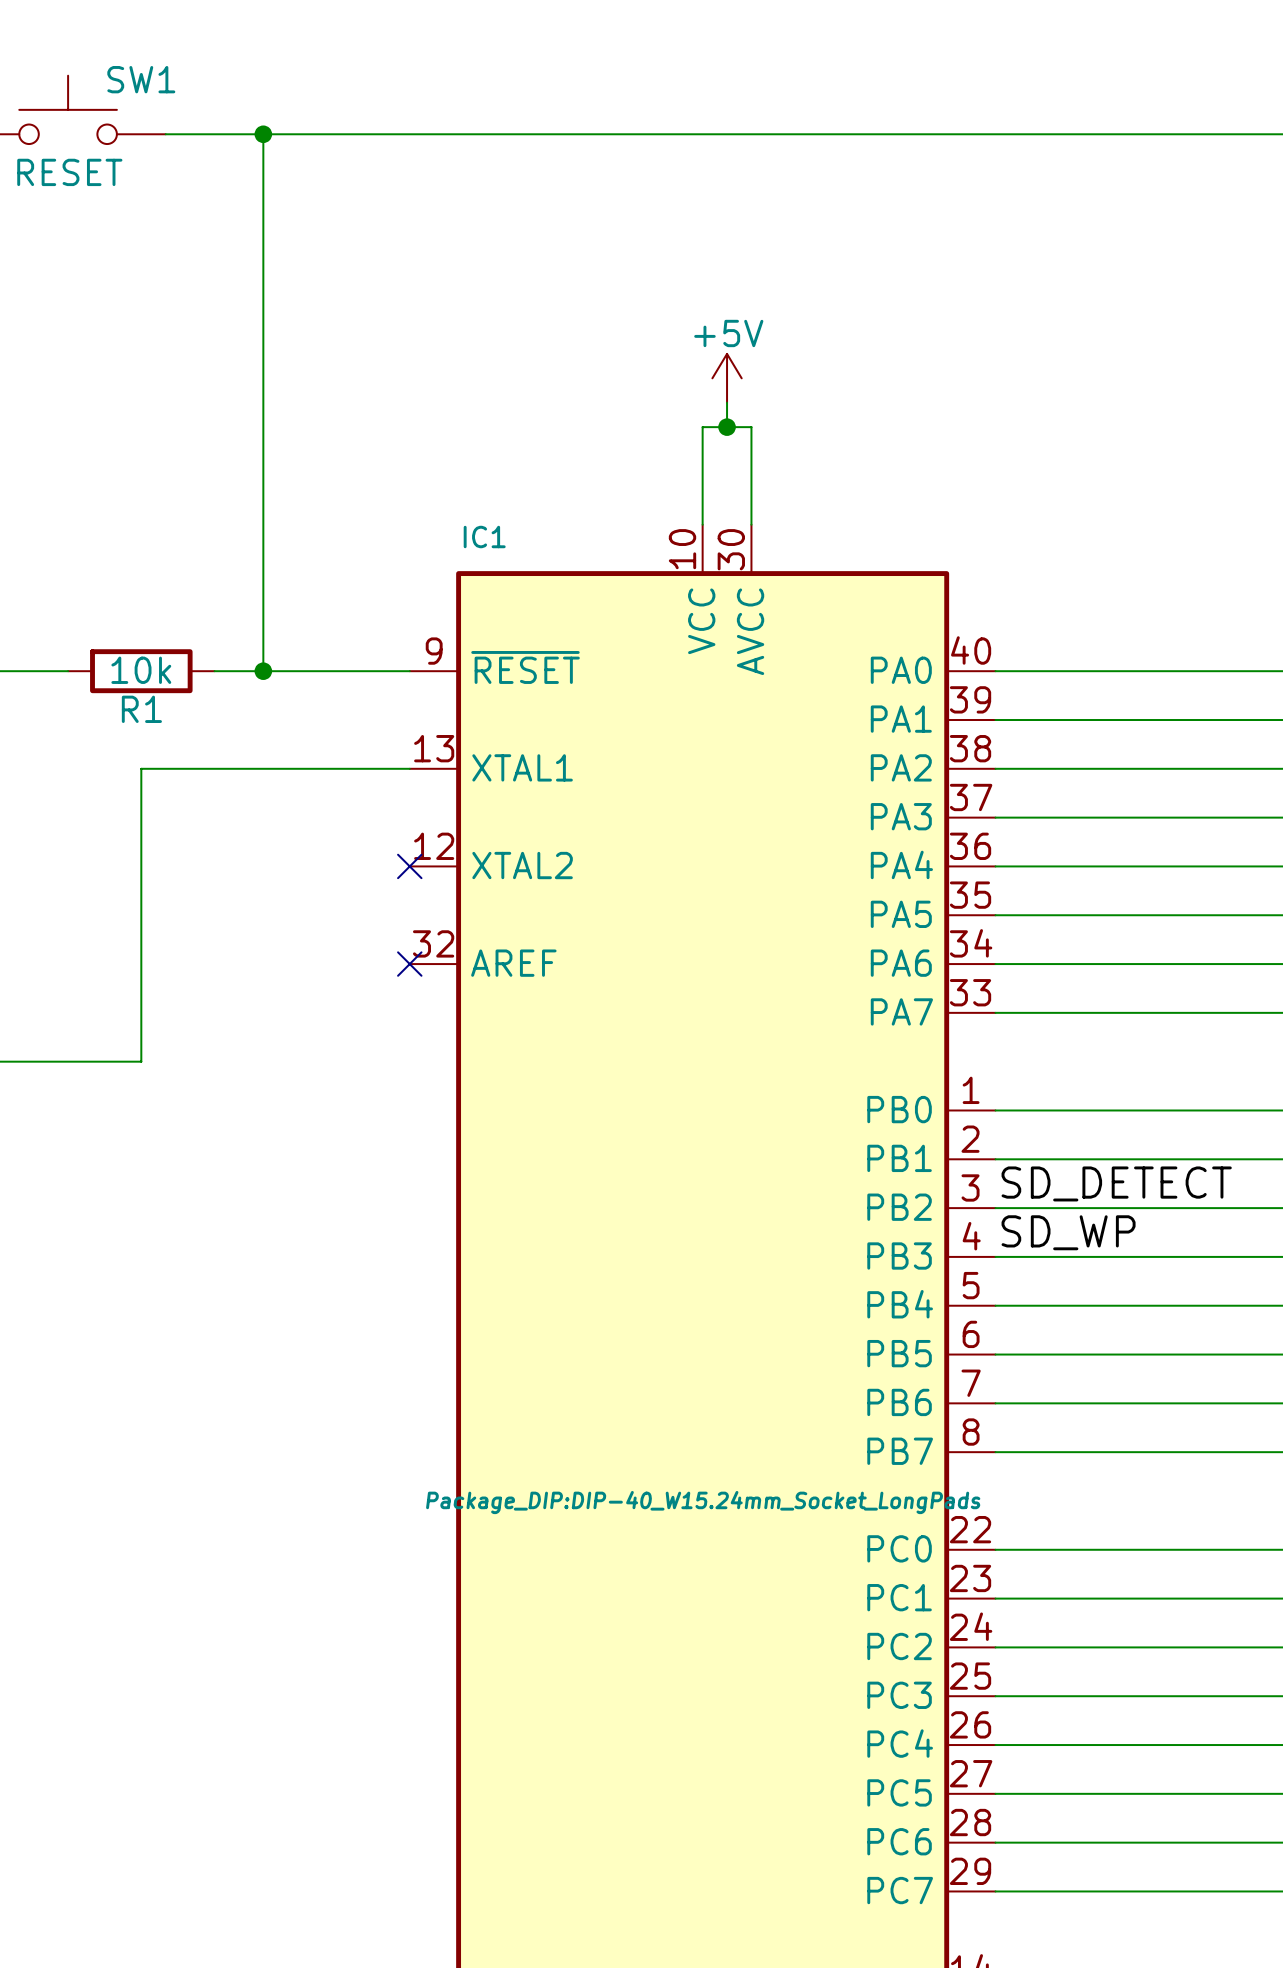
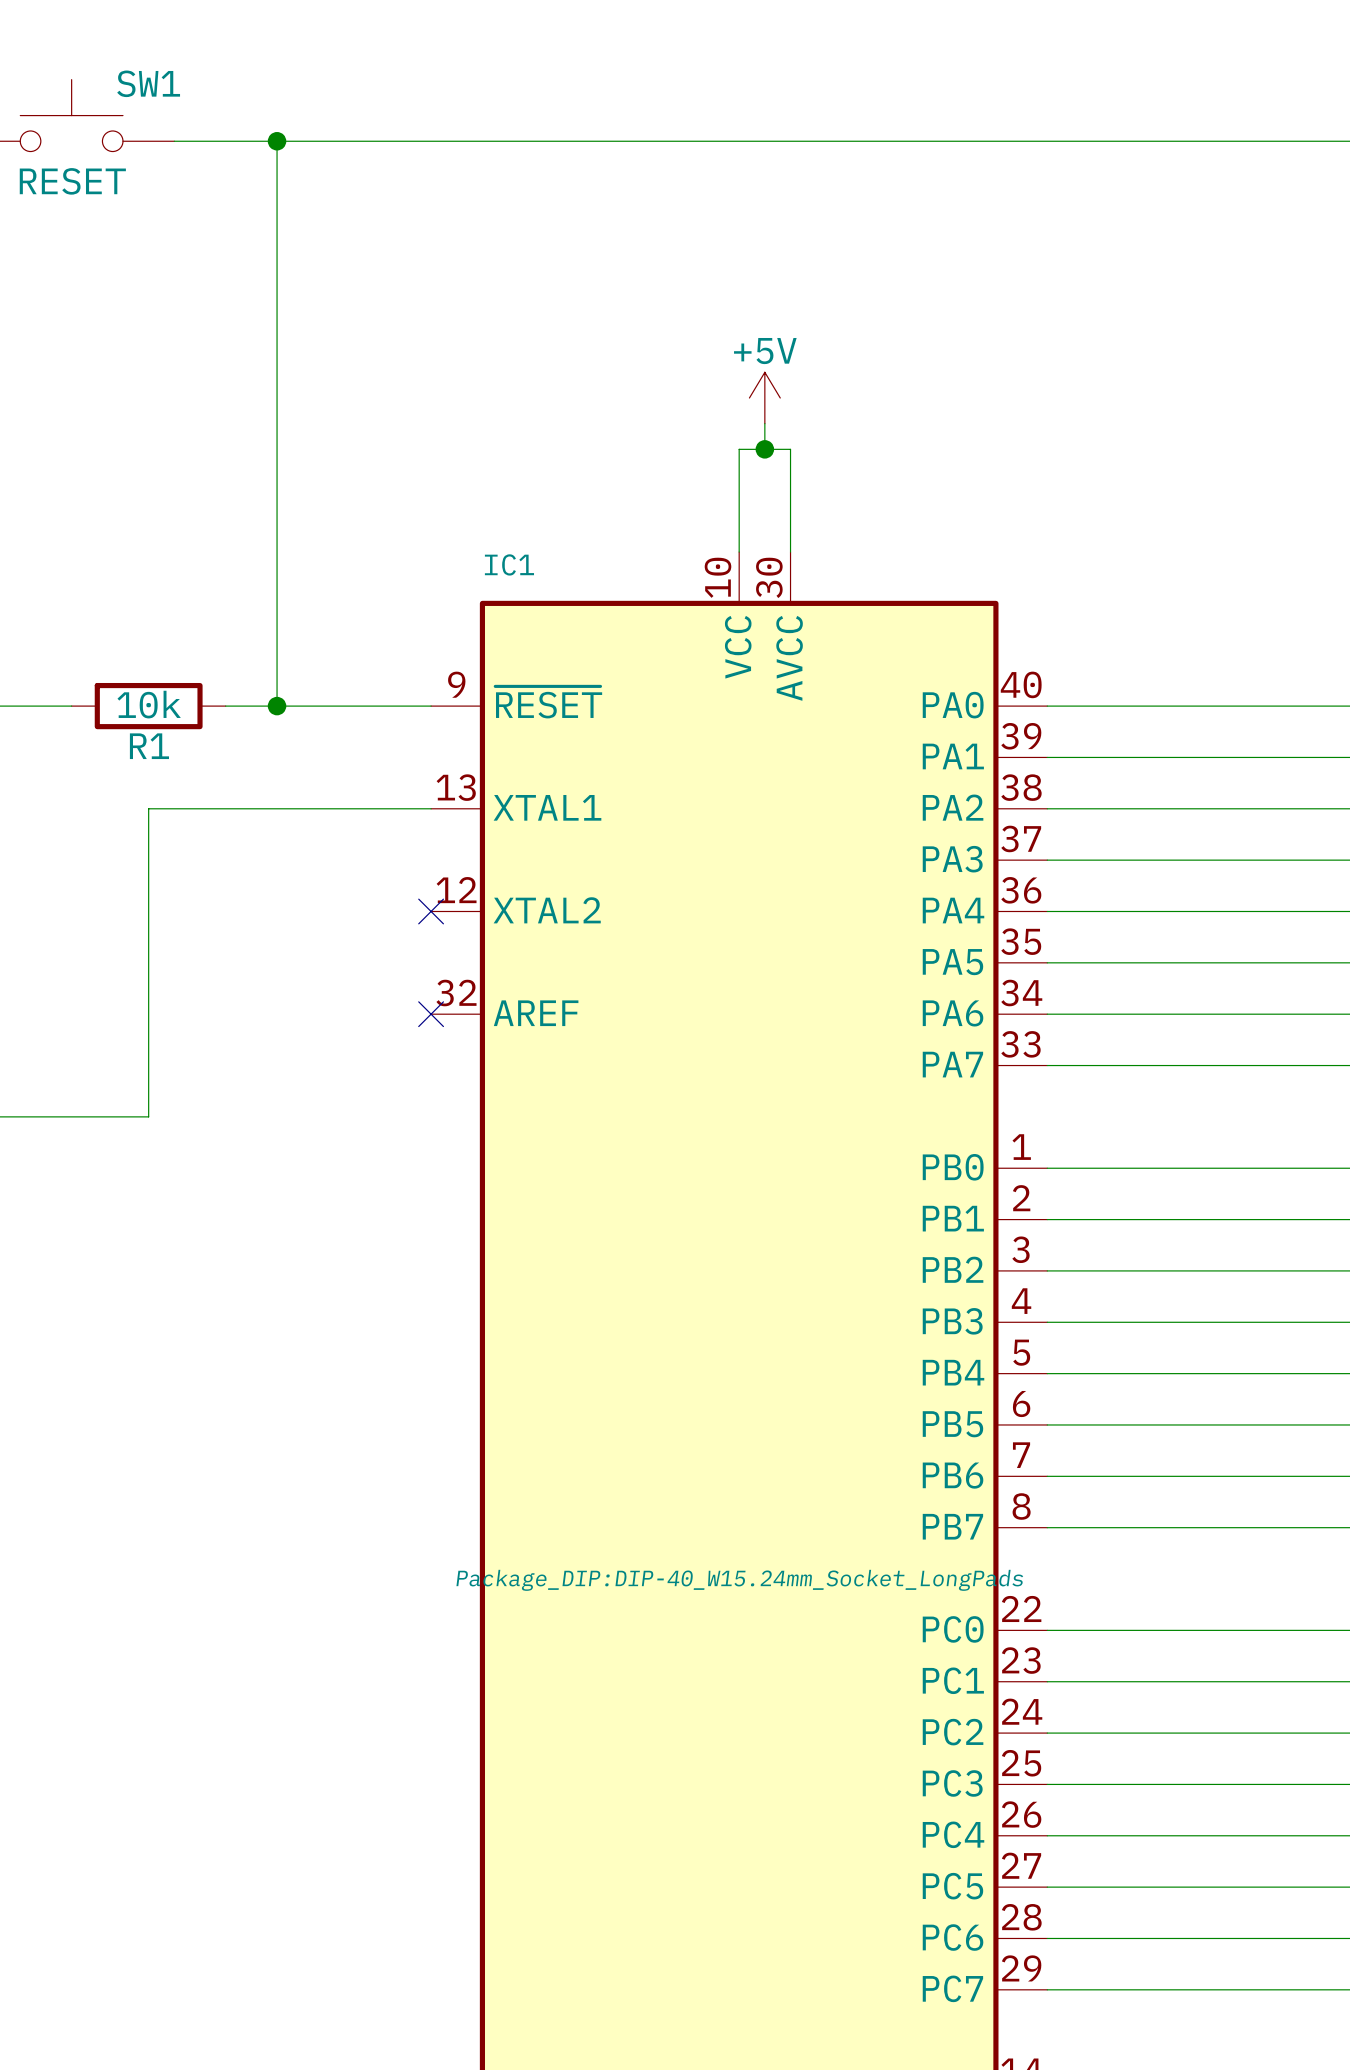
label: SD_DETECT (1116, 1183) -> none
label: SD_WP (1068, 1232) -> none

